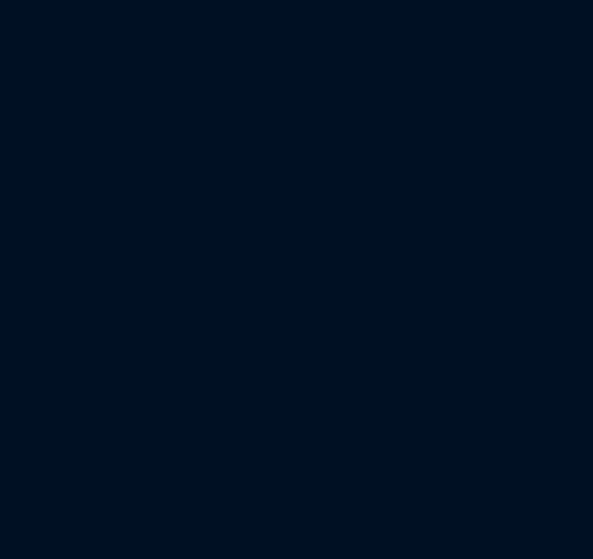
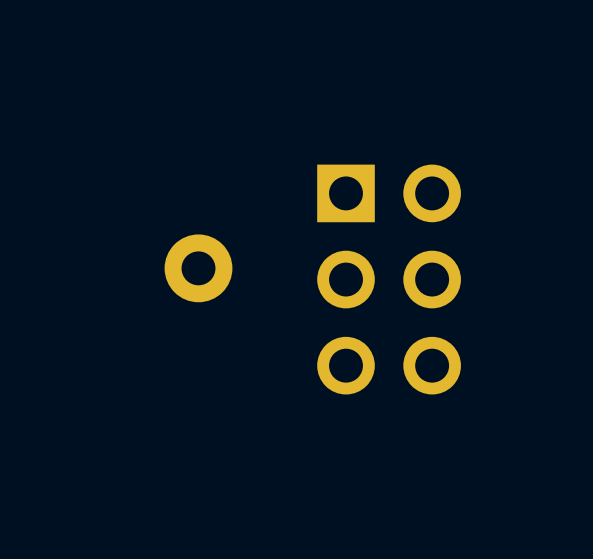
part: none -> (198, 268)
part: none -> (389, 279)

